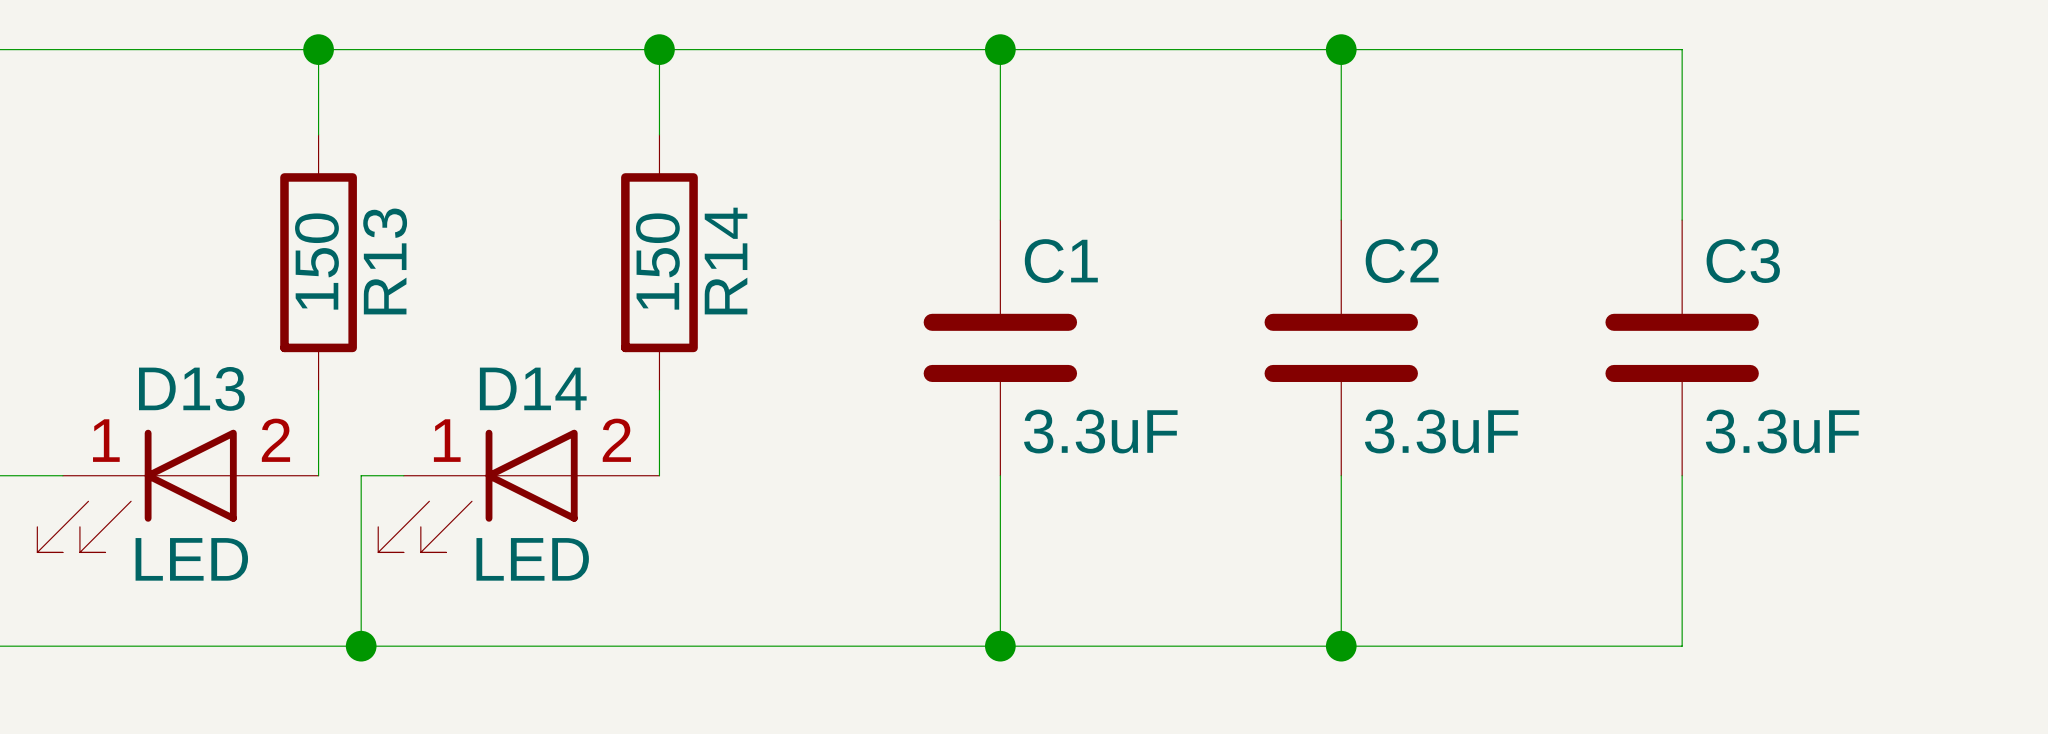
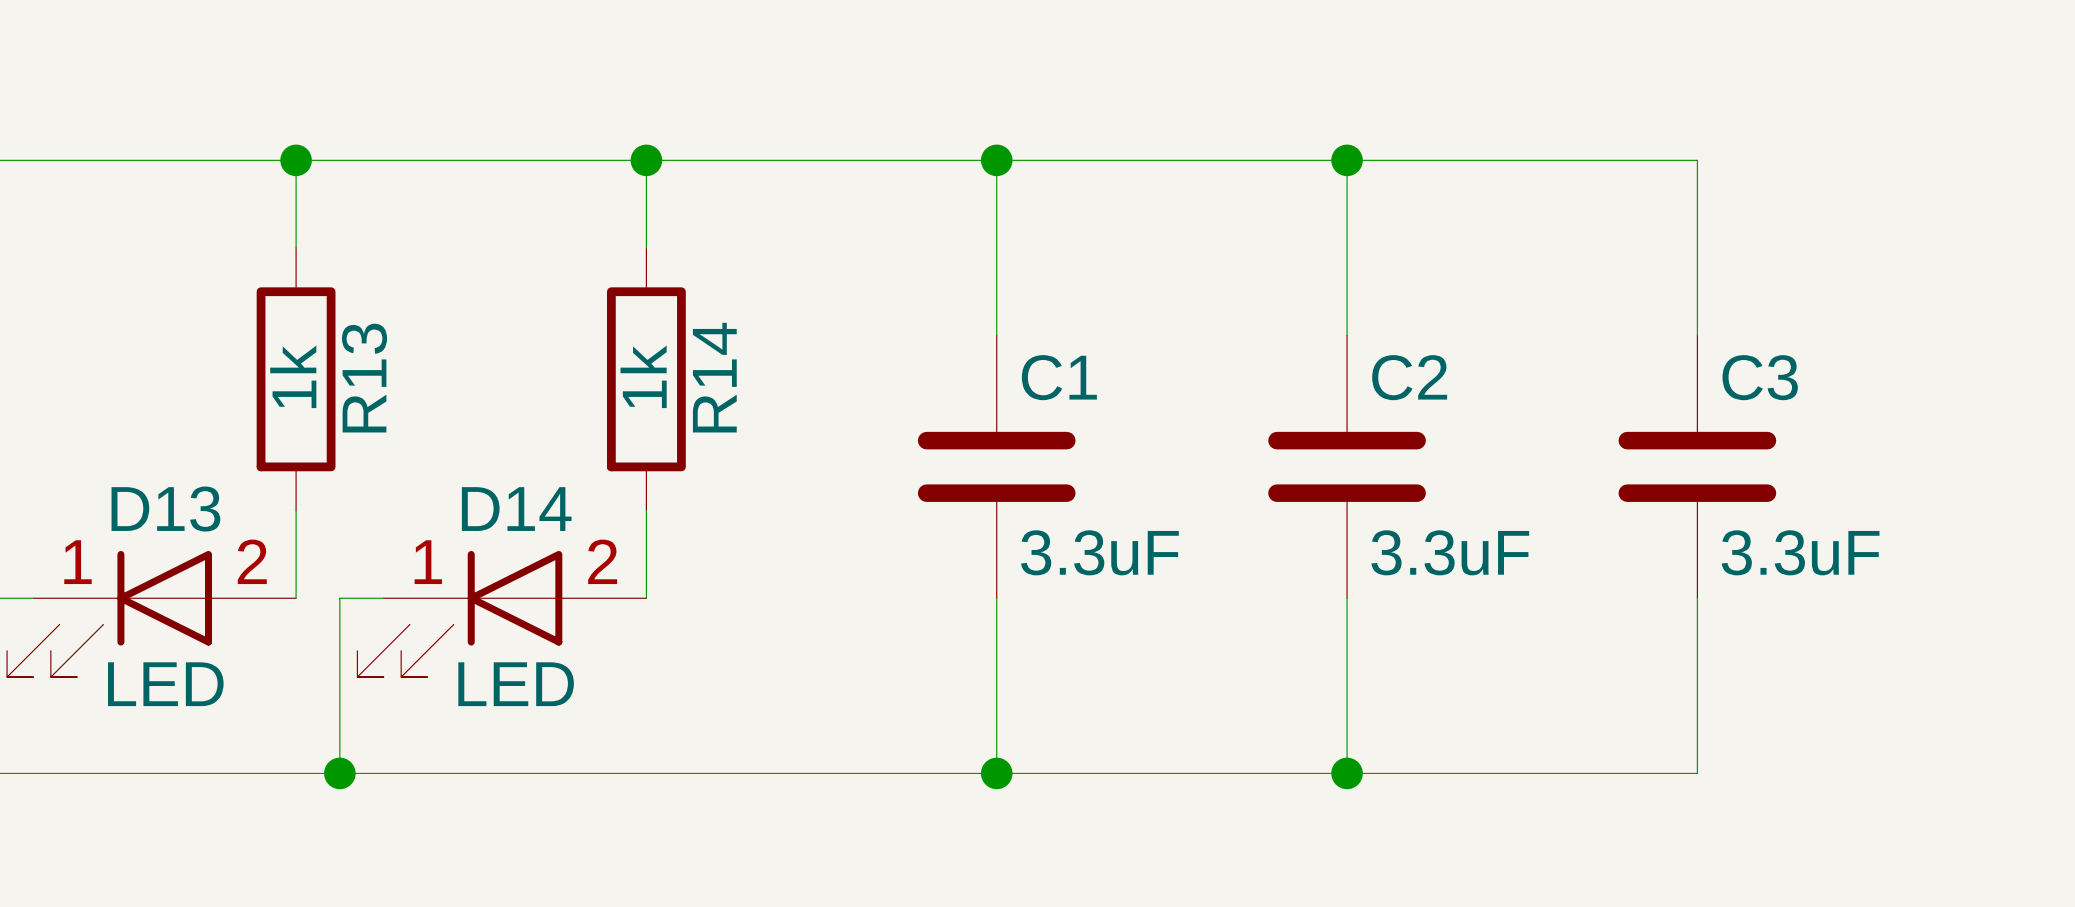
R13 value: 150 (316, 261) -> 1k (293, 376)
R14 value: 150 (657, 261) -> 1k (643, 376)

